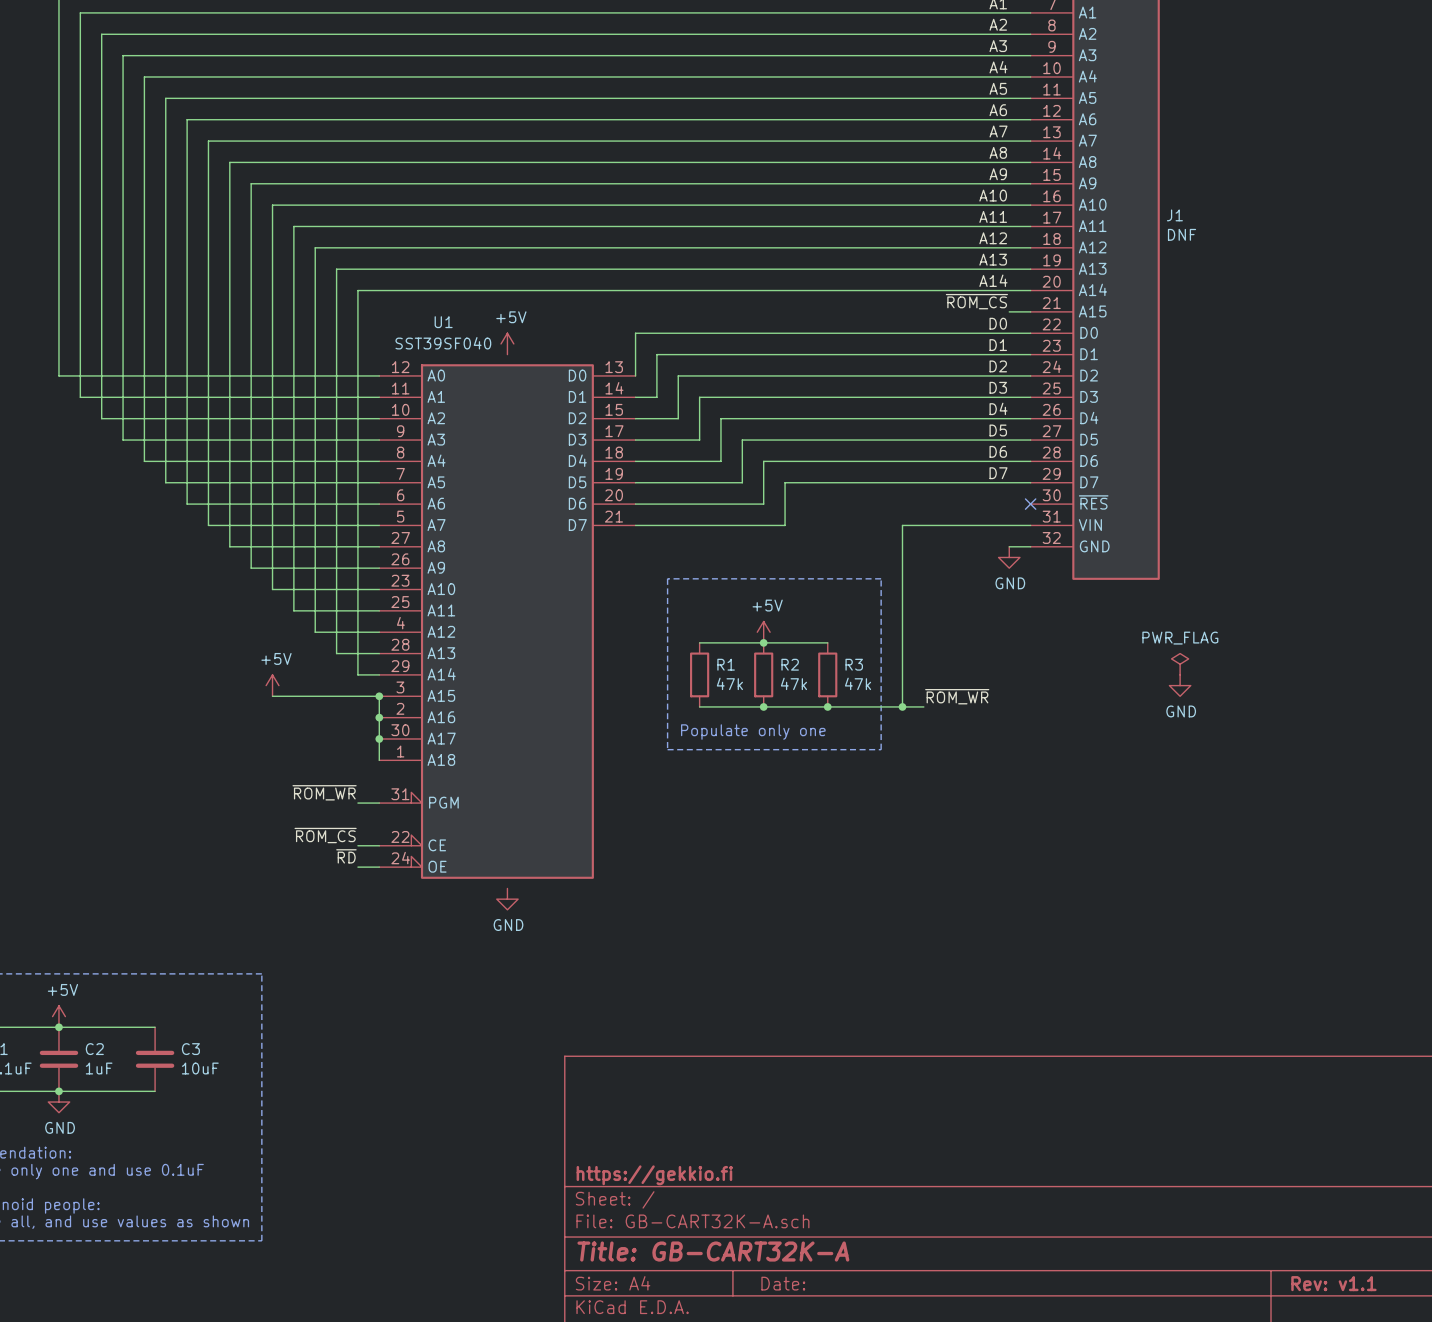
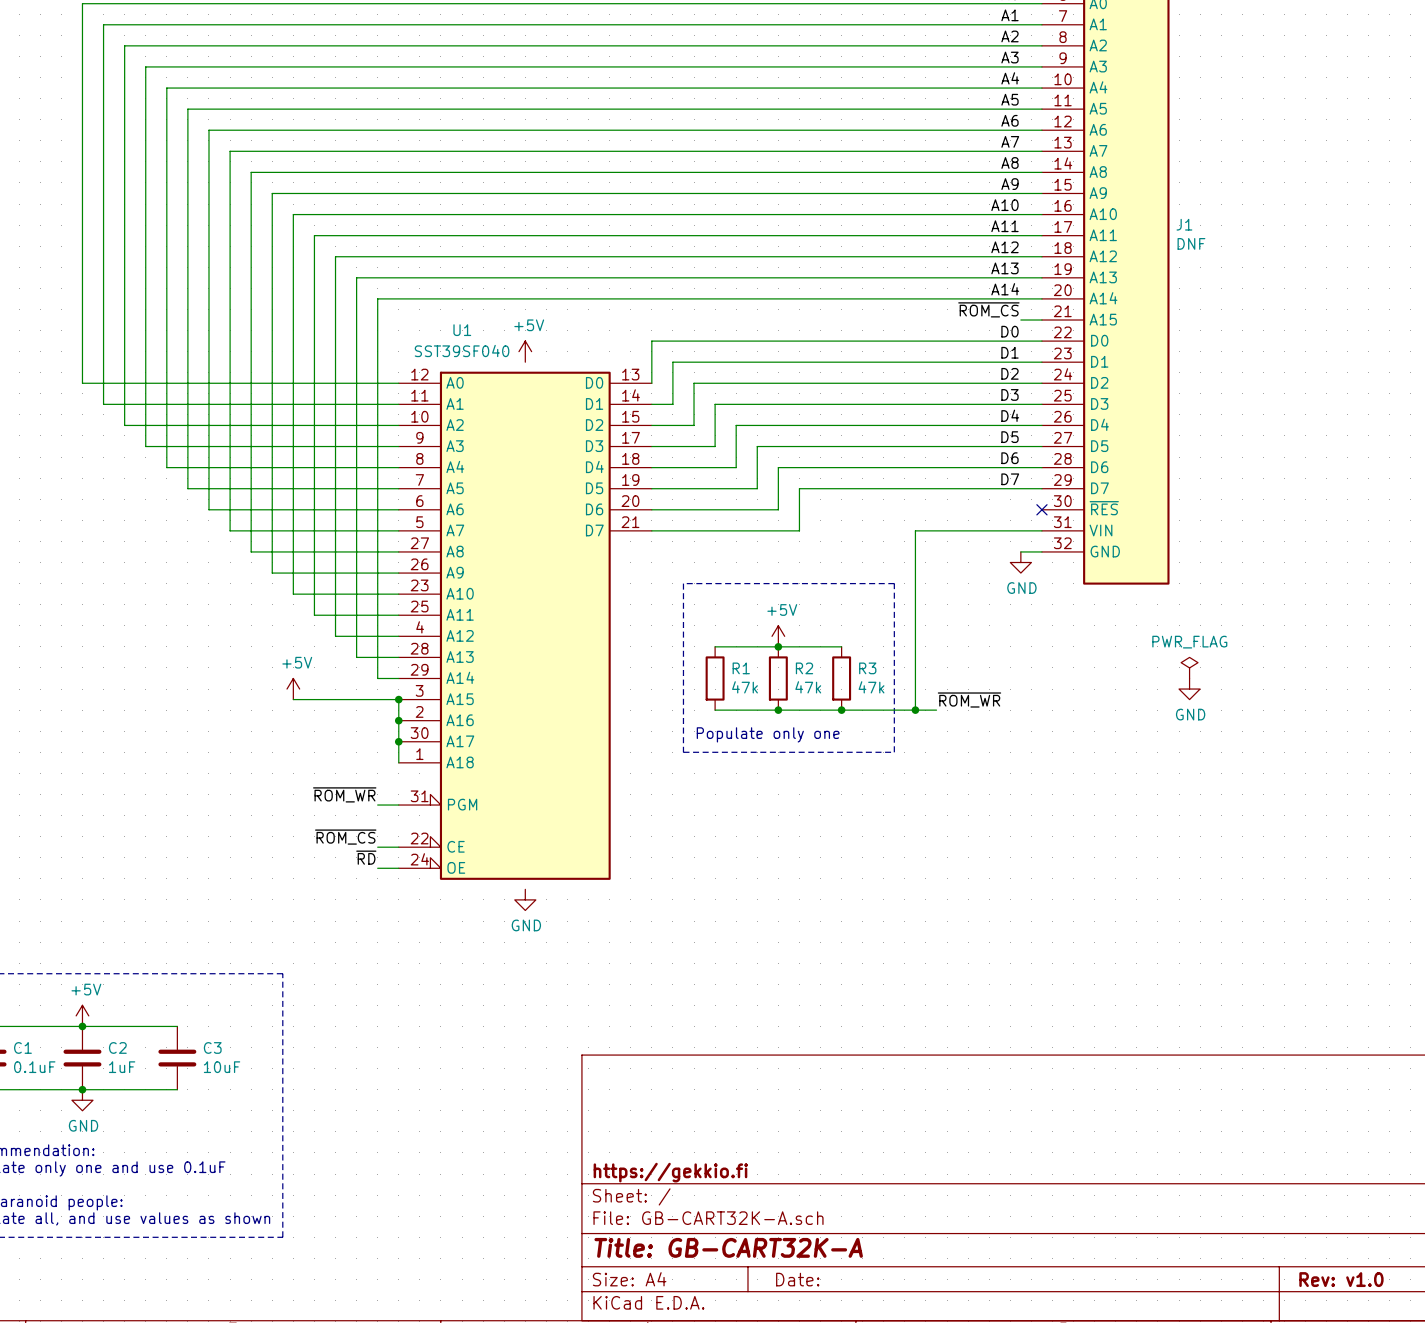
title block: Rev: v1.1 (1333, 1283) -> Rev: v1.0 (1341, 1279)

